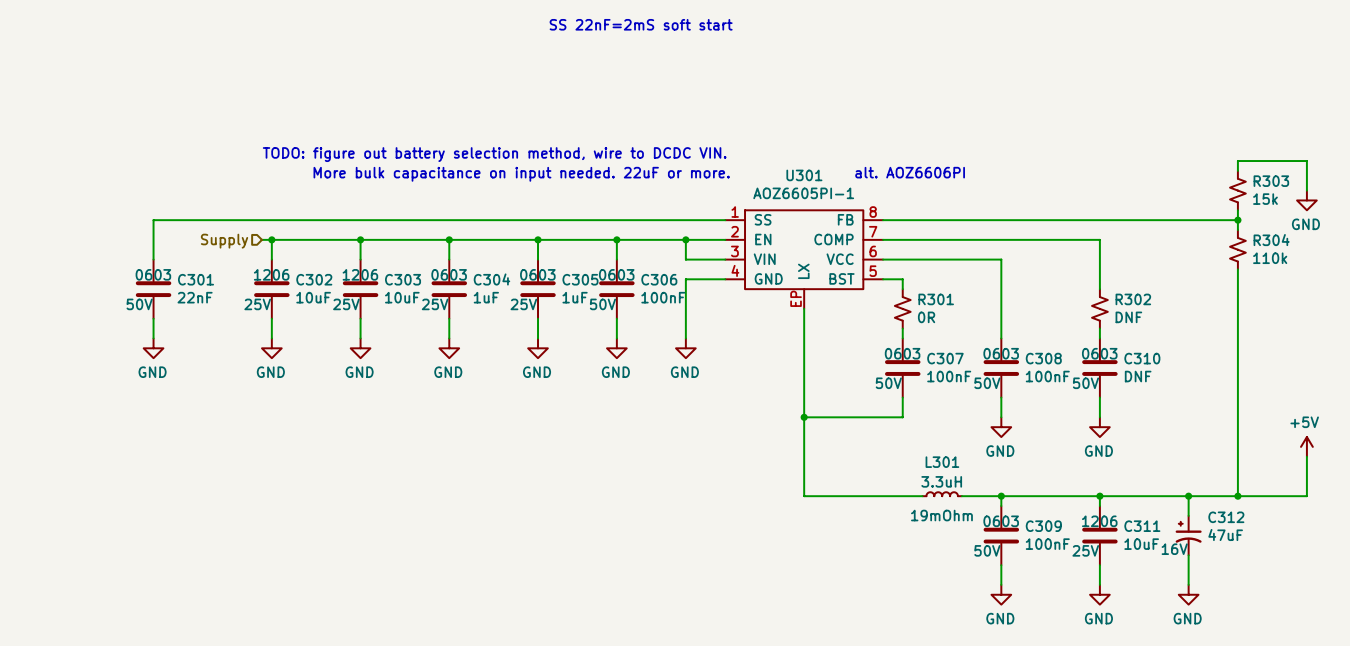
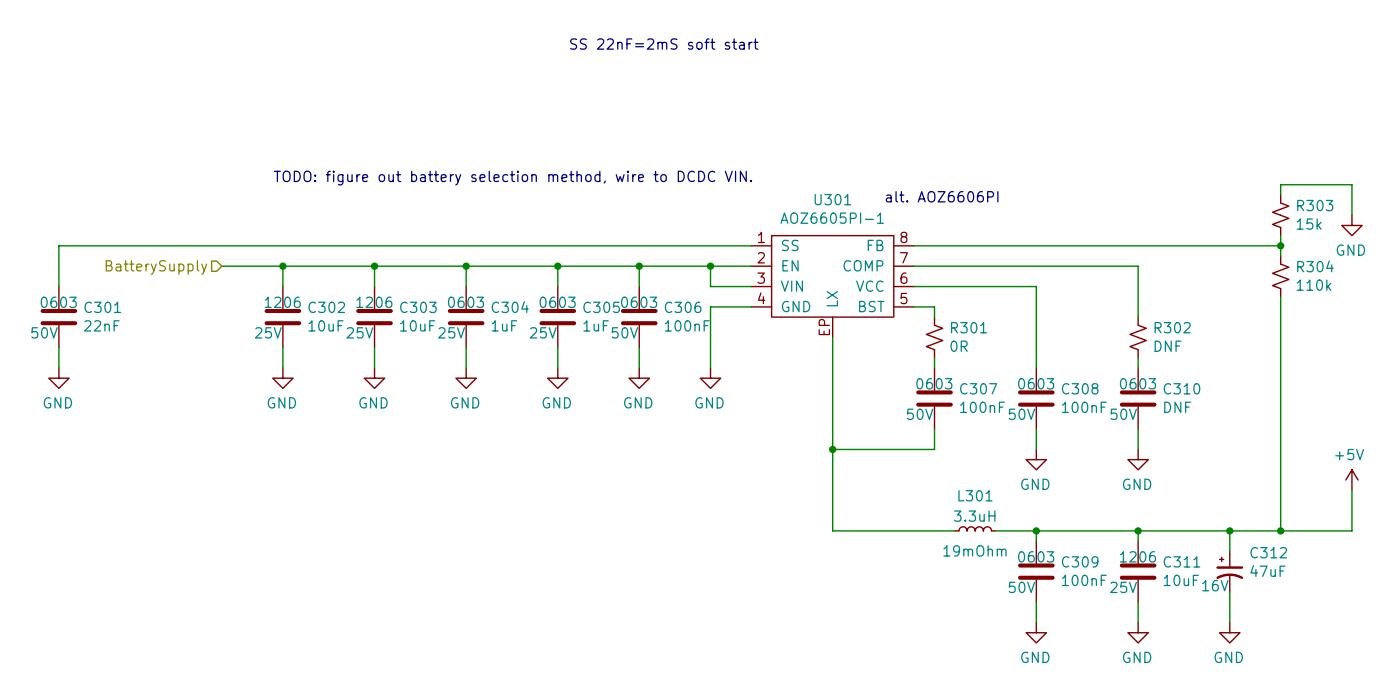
text: More bulk capacitance on input needed. 22uF or more. (521, 174) -> none
wire: (153, 220) (153, 259) -> (160, 245) (58, 245) (58, 286)
wire: none -> (221, 266) (272, 266)
hierarchical label: Supply (224, 241) -> BatterySupply (156, 267)
C301 position: (153, 289) -> (58, 317)
wire: (153, 318) (153, 338) -> (58, 347) (58, 368)
power symbol position: GND (153, 348) -> GND (58, 378)

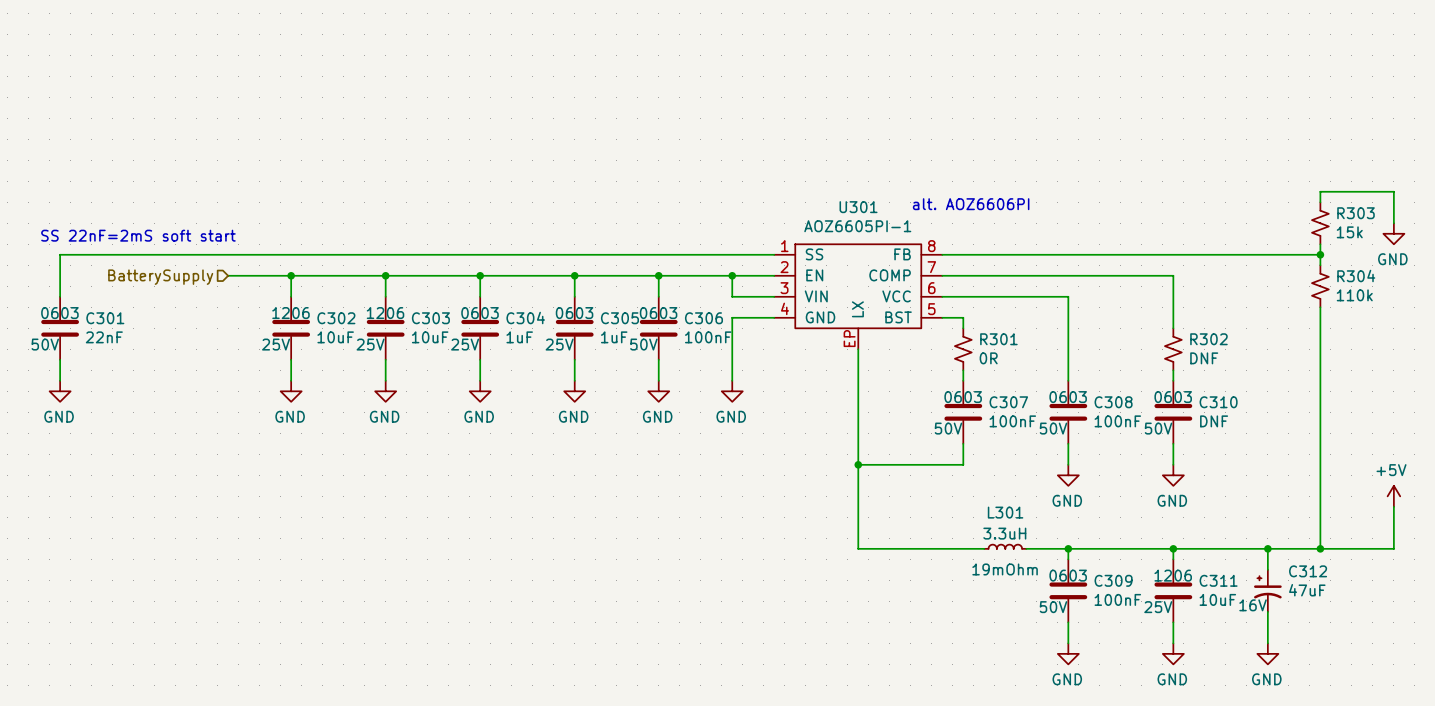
text: SS 22nF=2mS soft start (664, 44) -> none
text: TODO: figure out battery selection method, wire to DCDC VIN. (513, 178) -> none
text: none -> SS 22nF=2mS soft start (138, 235)

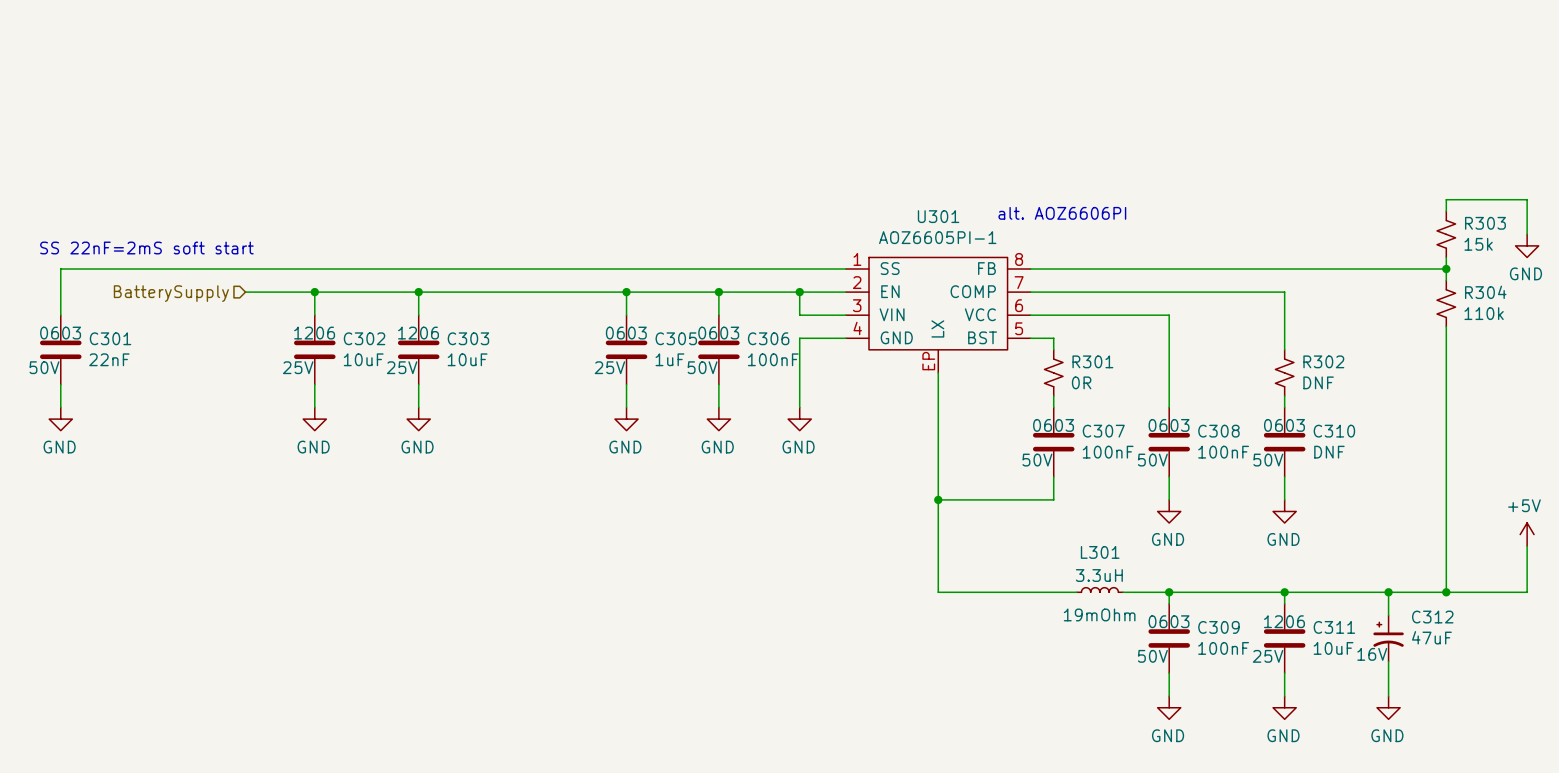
wire: (480, 275) (480, 296) -> none
junction: (480, 275) -> none
C304: 1uF (480, 328) -> none
wire: (480, 359) (480, 380) -> none
power symbol: GND (480, 391) -> none

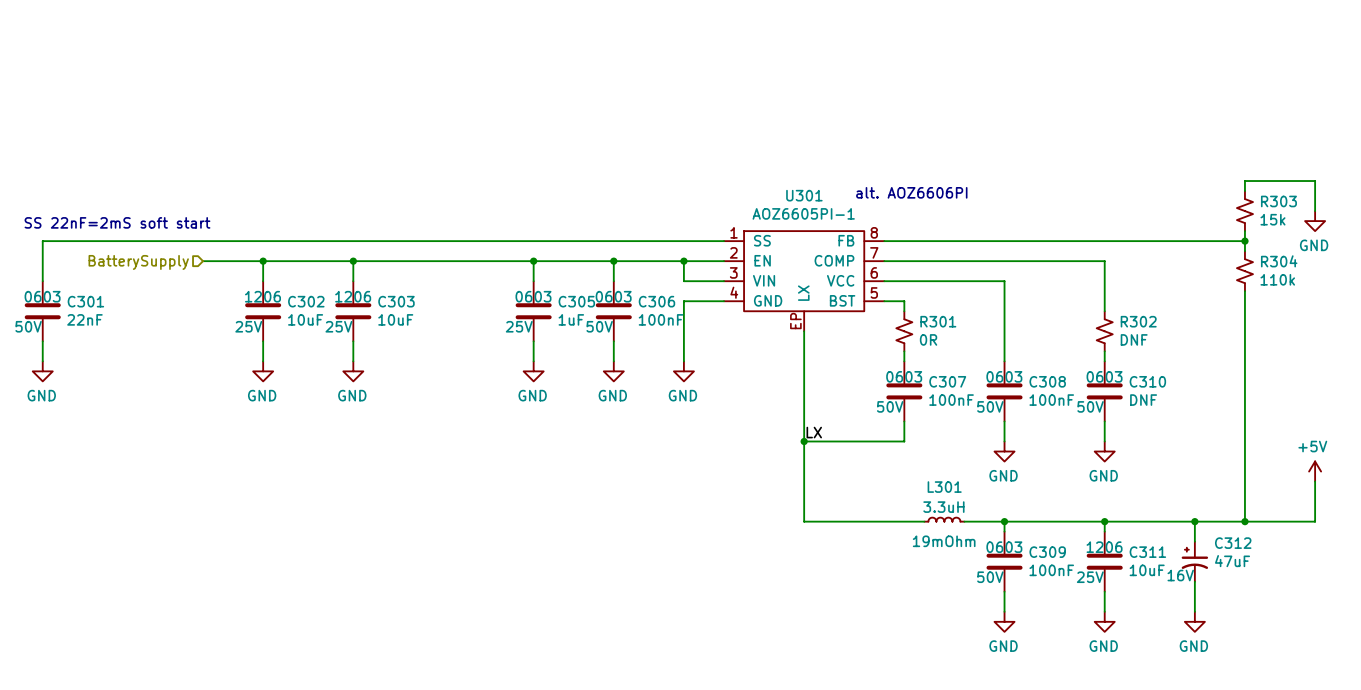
label: none -> LX (814, 432)

